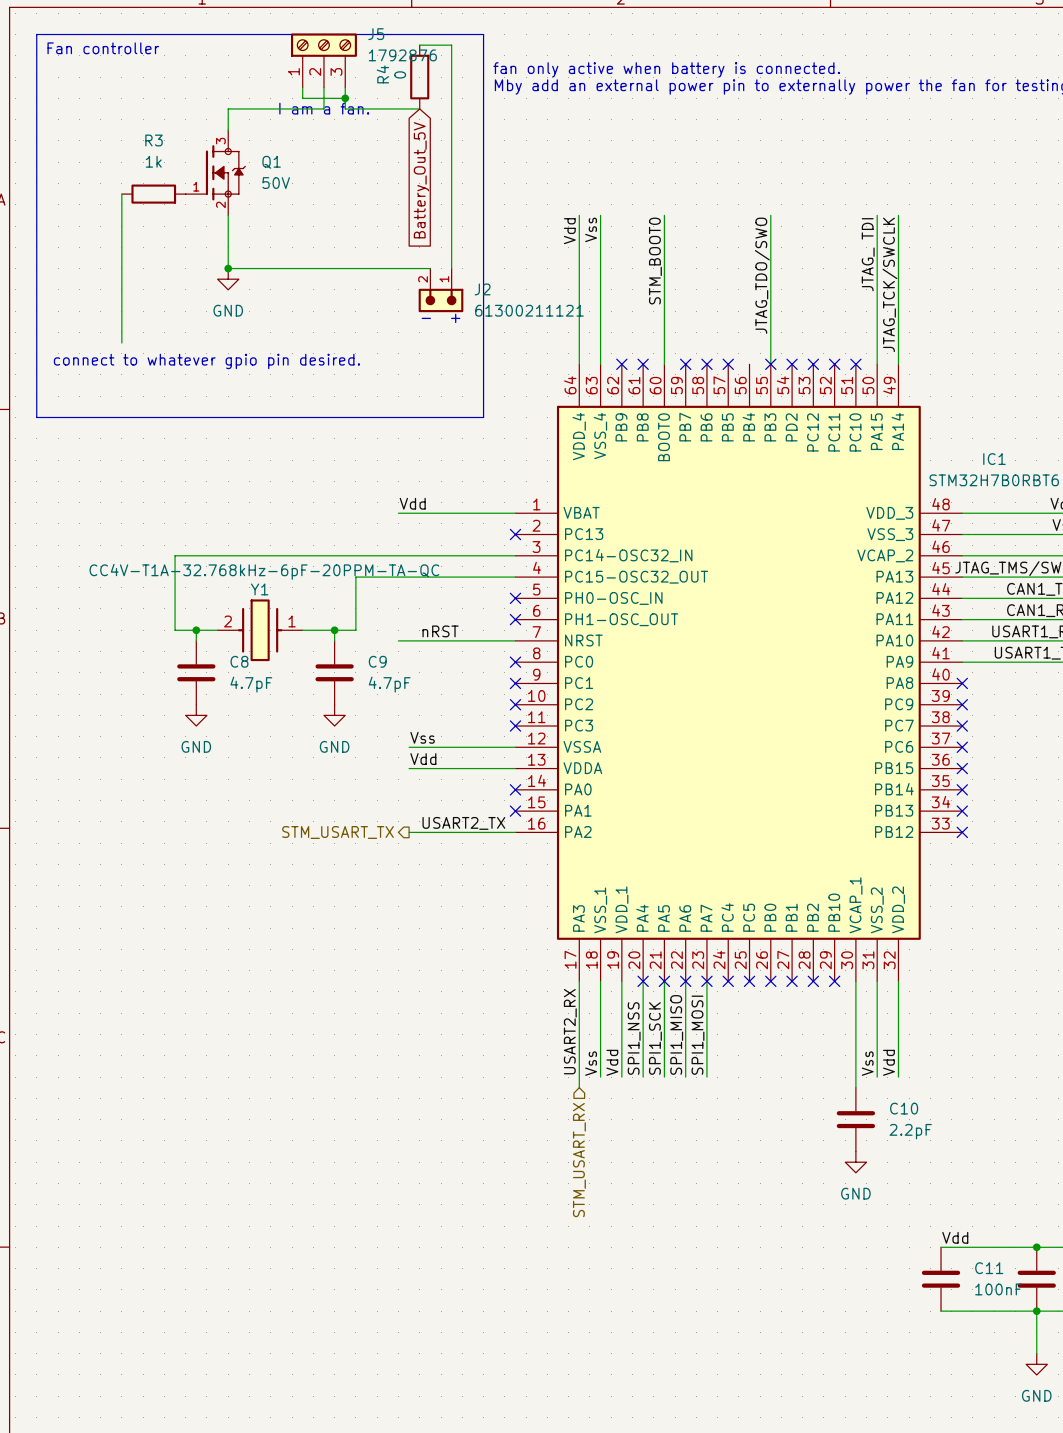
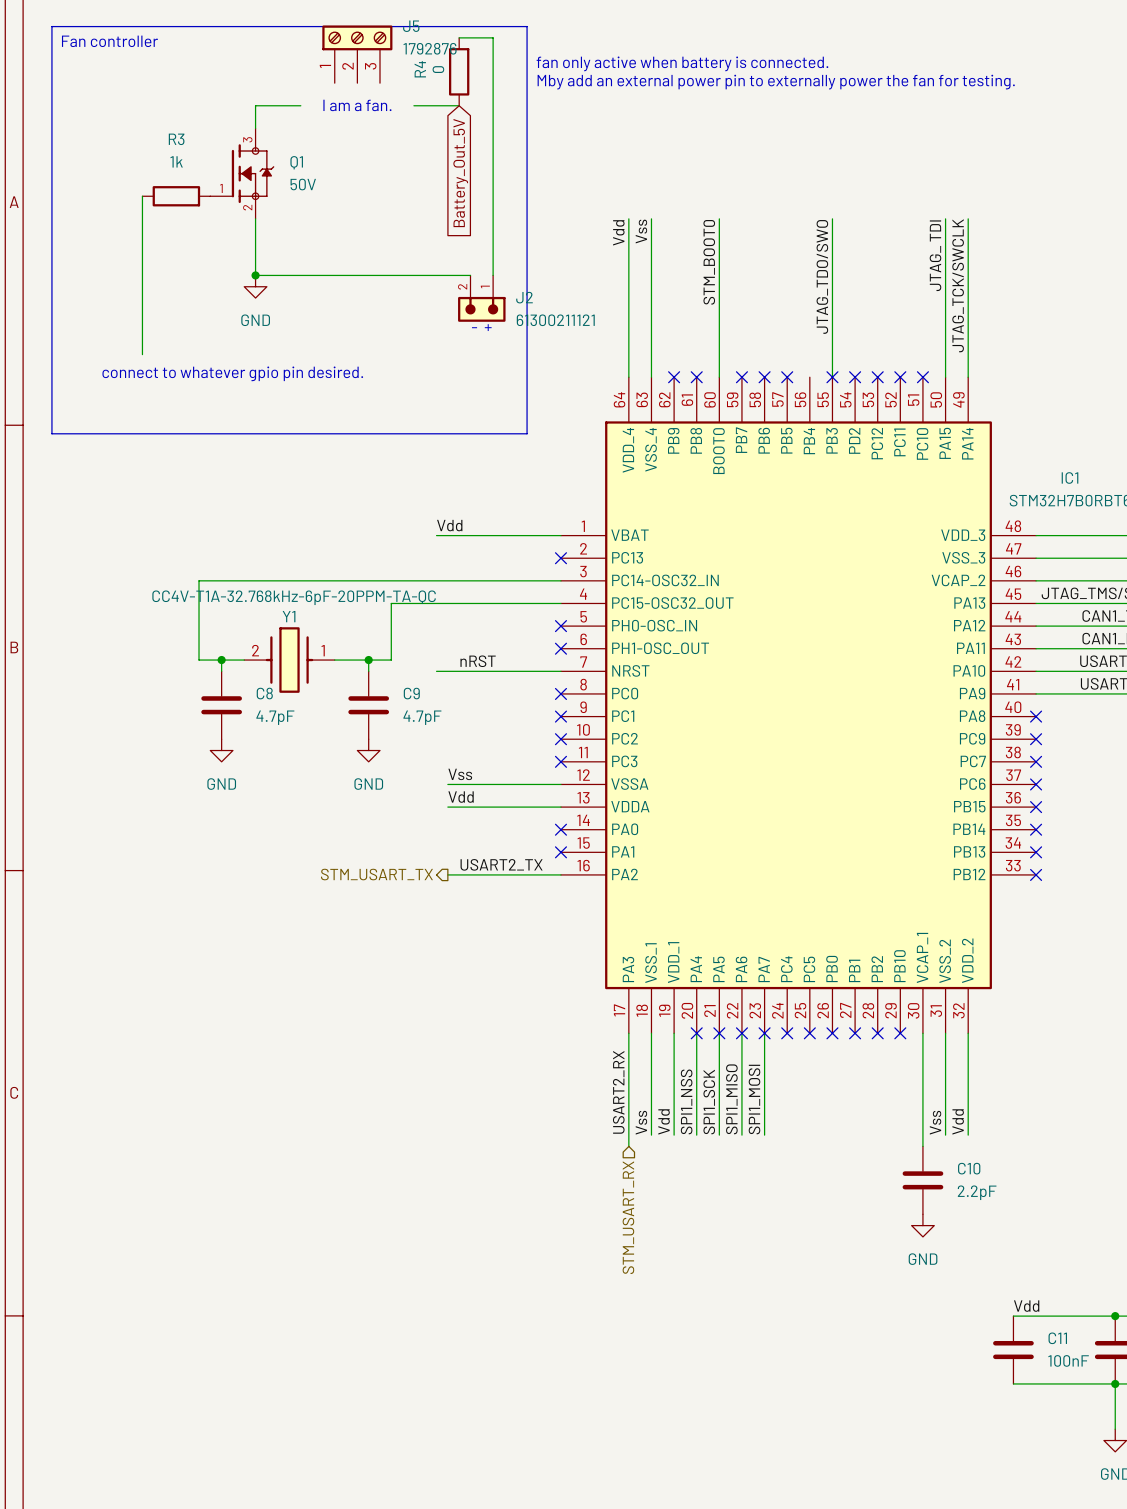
wire: (302, 87) (302, 98) (345, 98) -> none
wire: (323, 87) (323, 108) (270, 108) -> none
wire: (345, 87) (345, 108) (377, 108) -> none
junction: (345, 98) -> none

